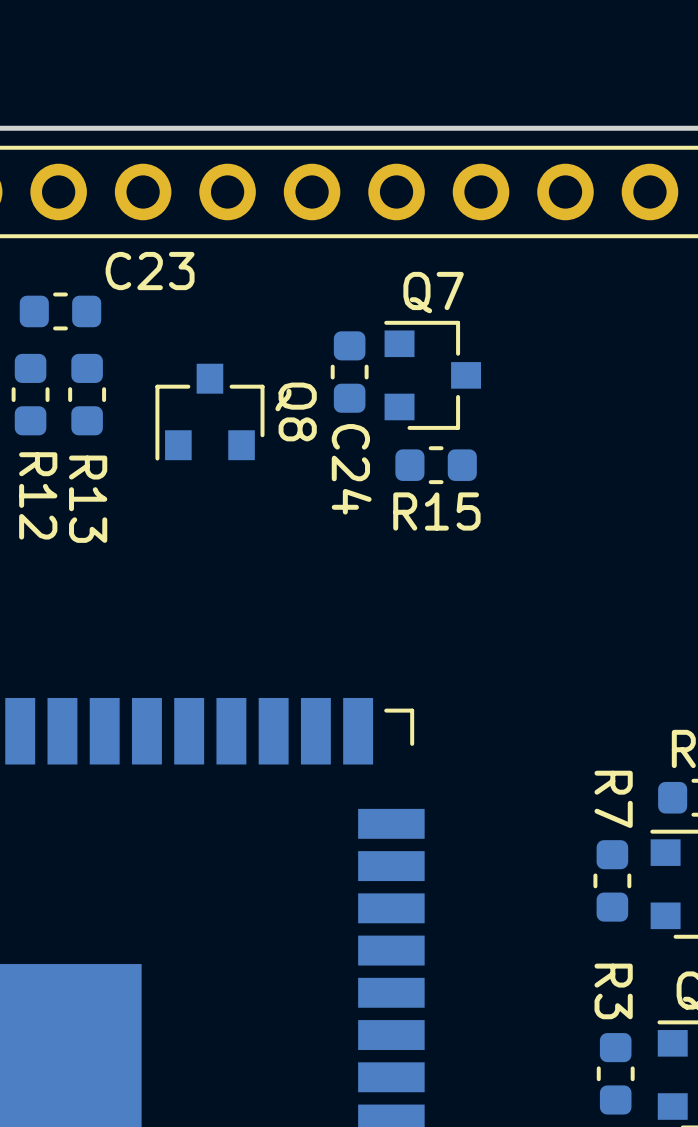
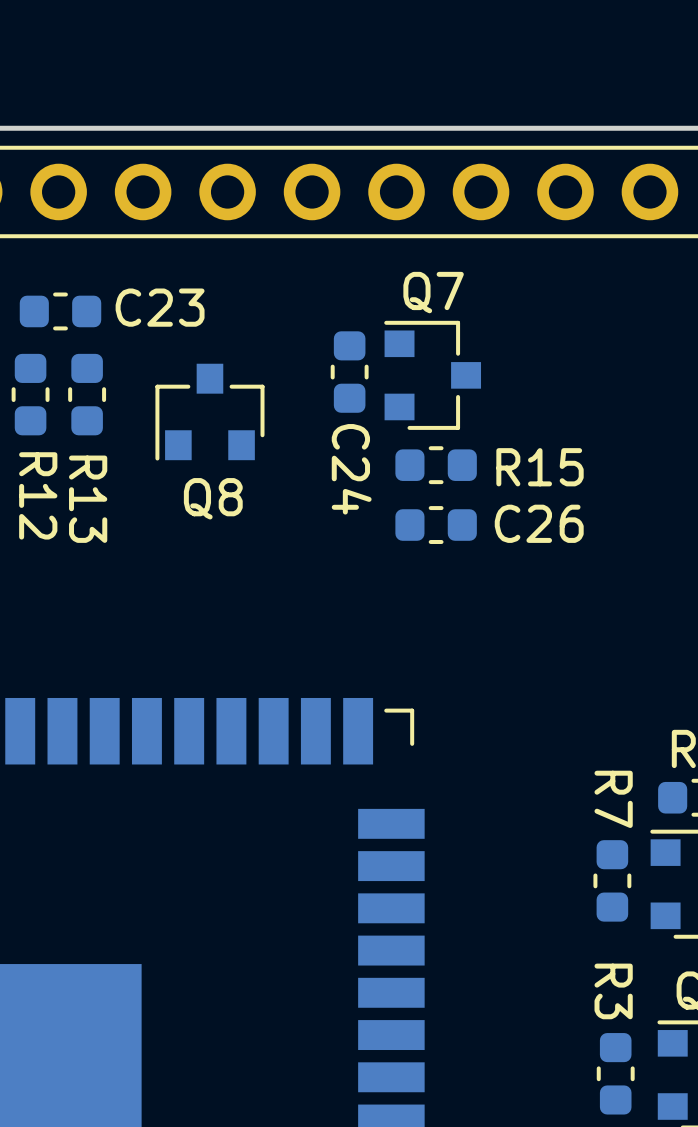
C23 name position: C23 (150, 271) -> C23 (160, 307)
Q8 name rotation: 0° (296, 411) -> 90° counterclockwise (213, 498)
Q8 name position: Q8 (296, 411) -> Q8 (213, 498)
R15 name position: R15 (436, 511) -> R15 (540, 467)
C26: none -> (436, 525)

